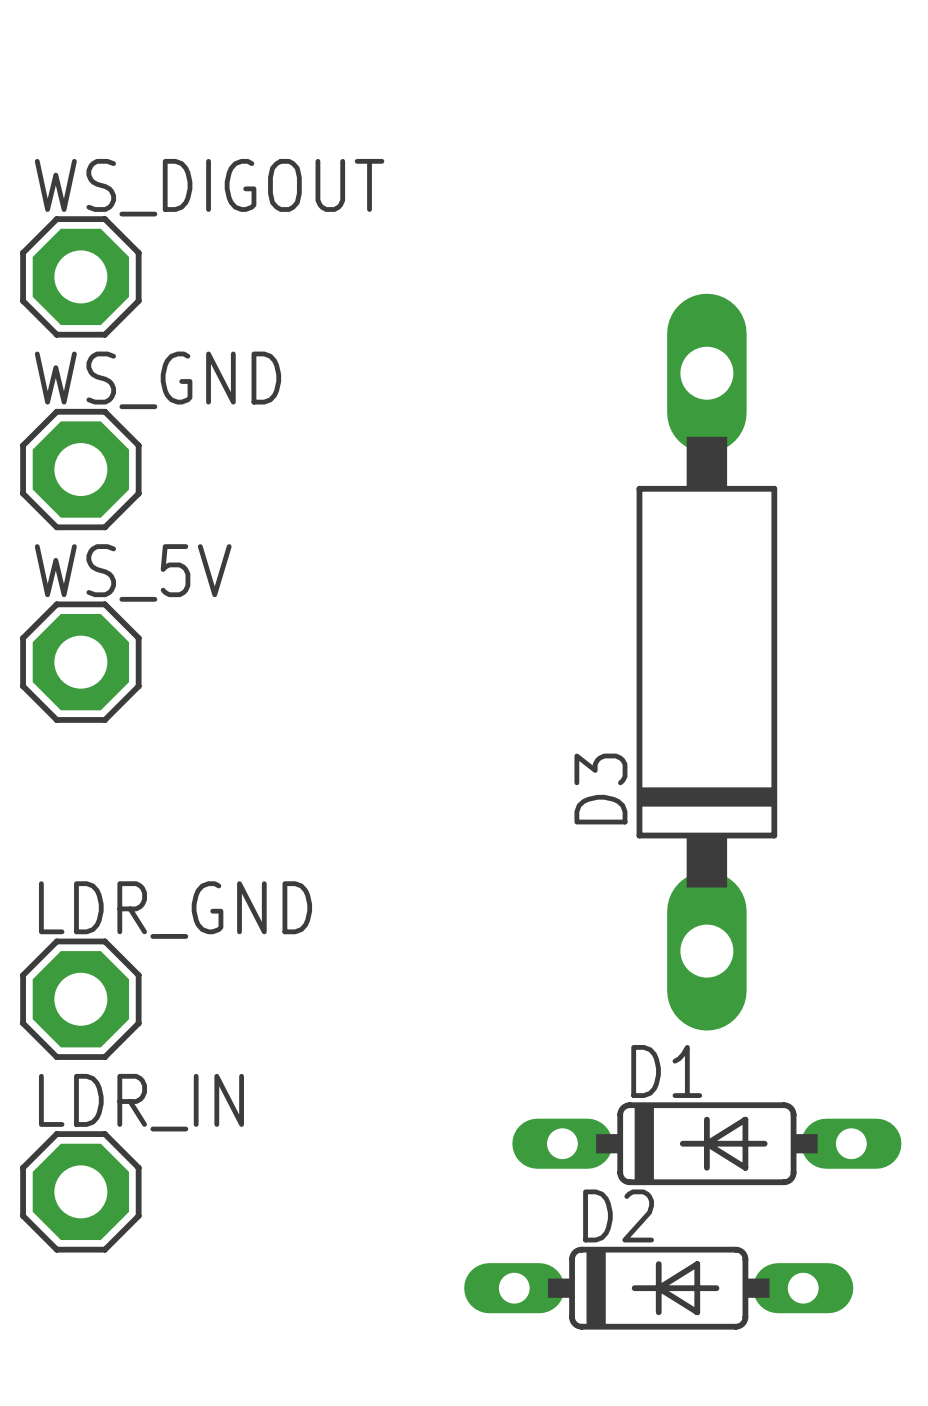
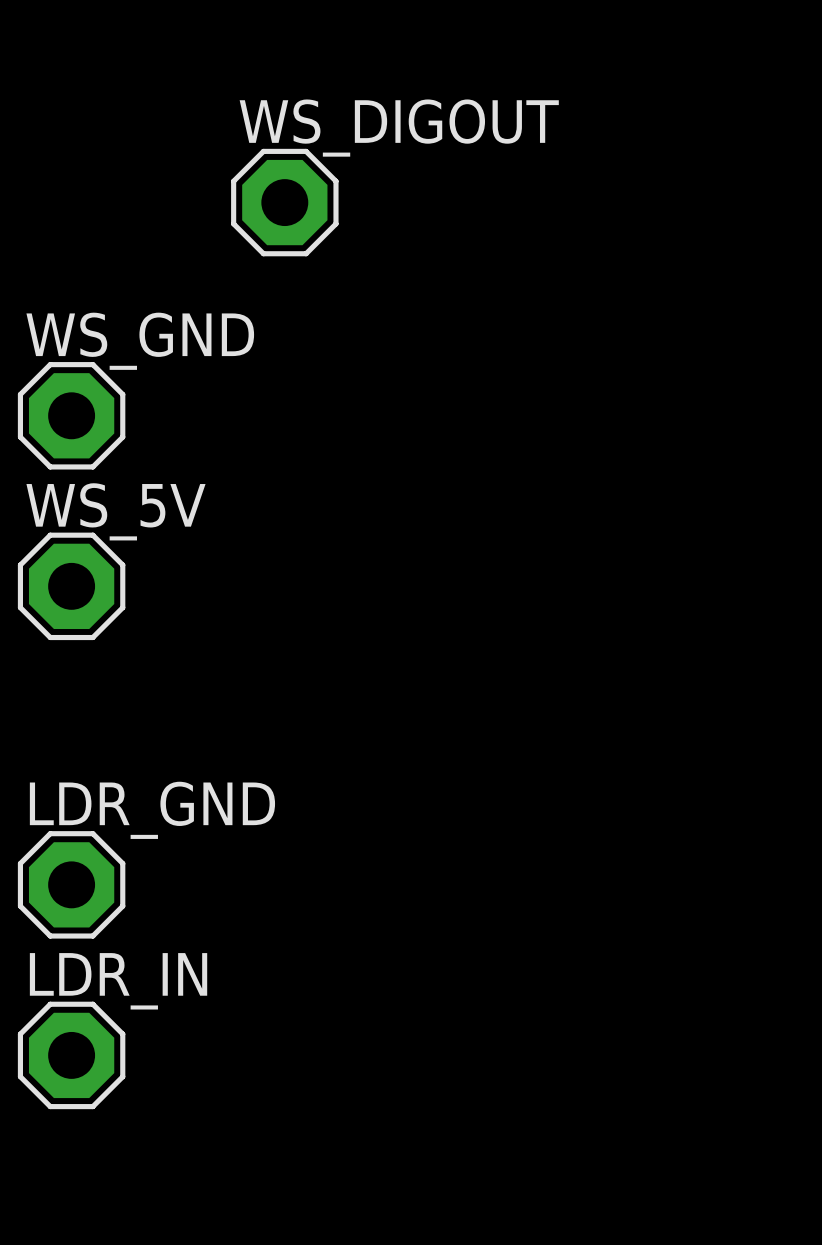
WS_DIGOUT position: (80, 276) -> (284, 202)
D3: (706, 662) -> none
D1: (706, 1143) -> none
D2: (658, 1288) -> none

